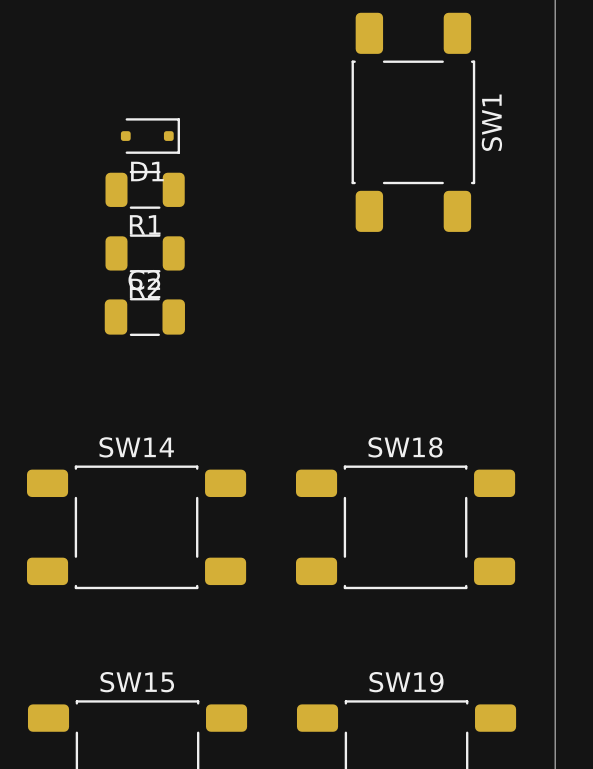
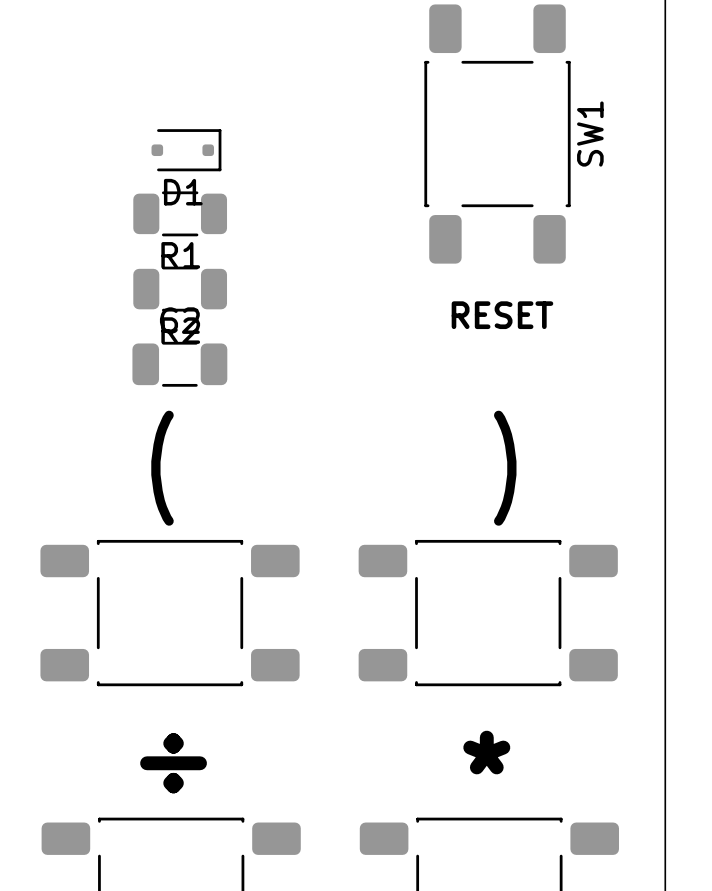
text: none -> RESET (502, 315)
text: none -> ( (162, 468)
text: none -> ) (505, 468)
SW14 name: SW14 (136, 447) -> none
SW18 name: SW18 (405, 447) -> none
text: none -> * (486, 752)
text: none -> ÷ (173, 763)
SW15 name: SW15 (137, 682) -> none
SW19 name: SW19 (406, 682) -> none

